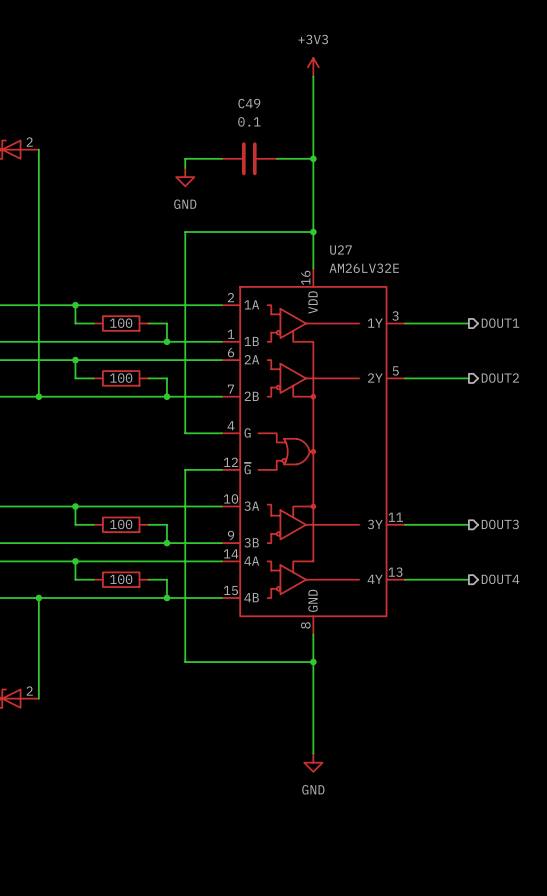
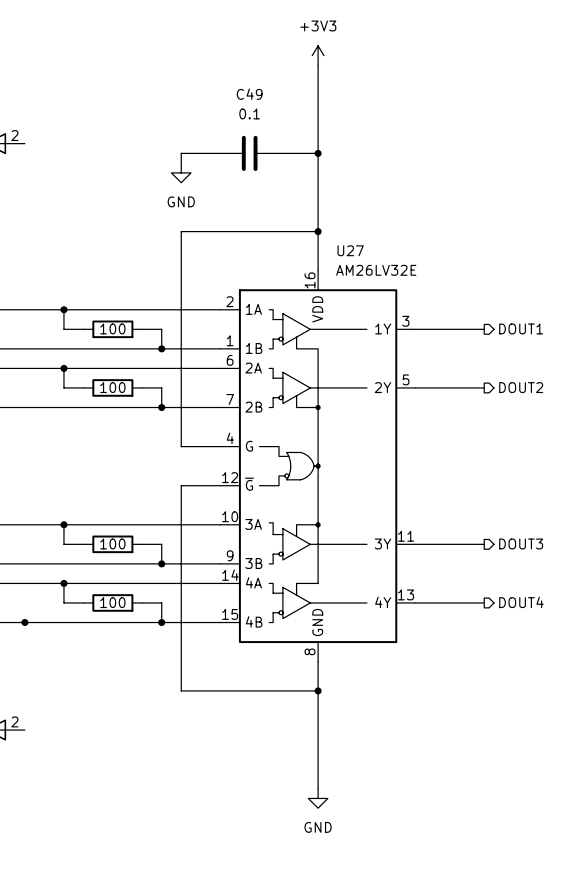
wire: (38, 149) (38, 396) -> none
junction: (38, 396) -> none
wire: (38, 598) (38, 698) -> none

